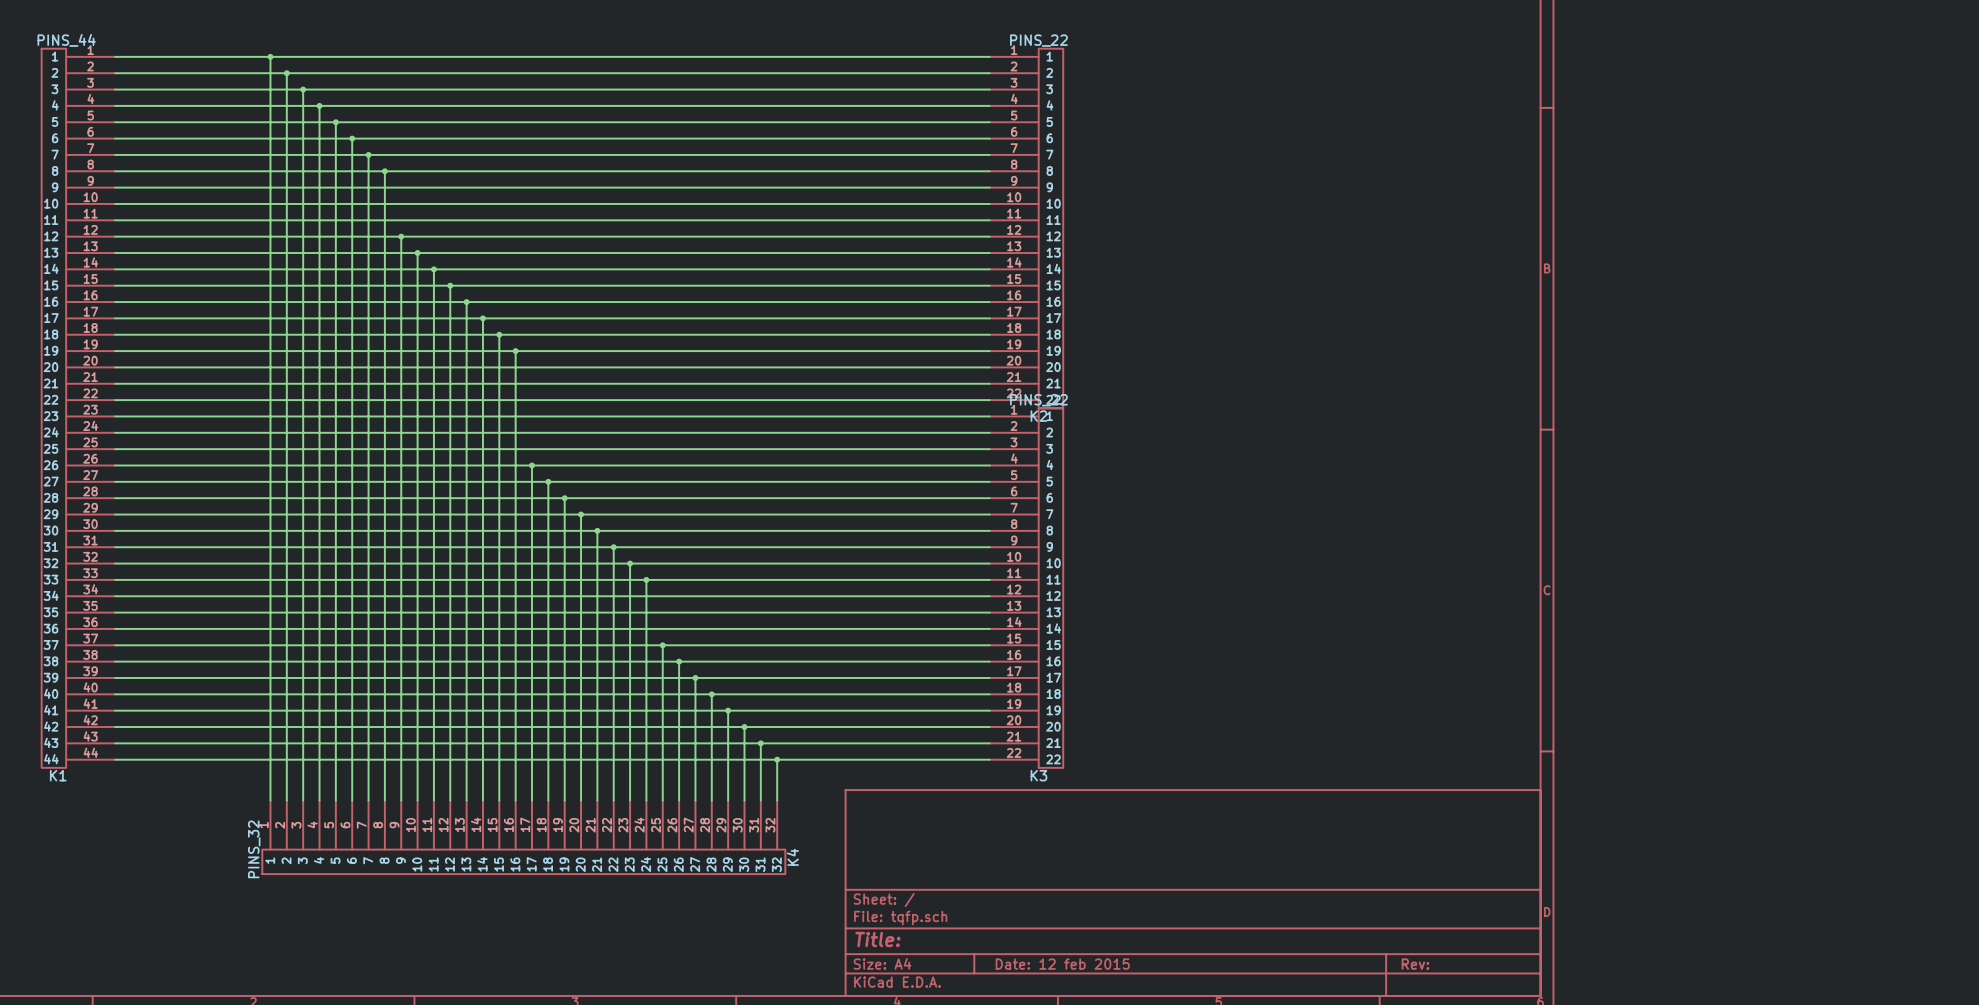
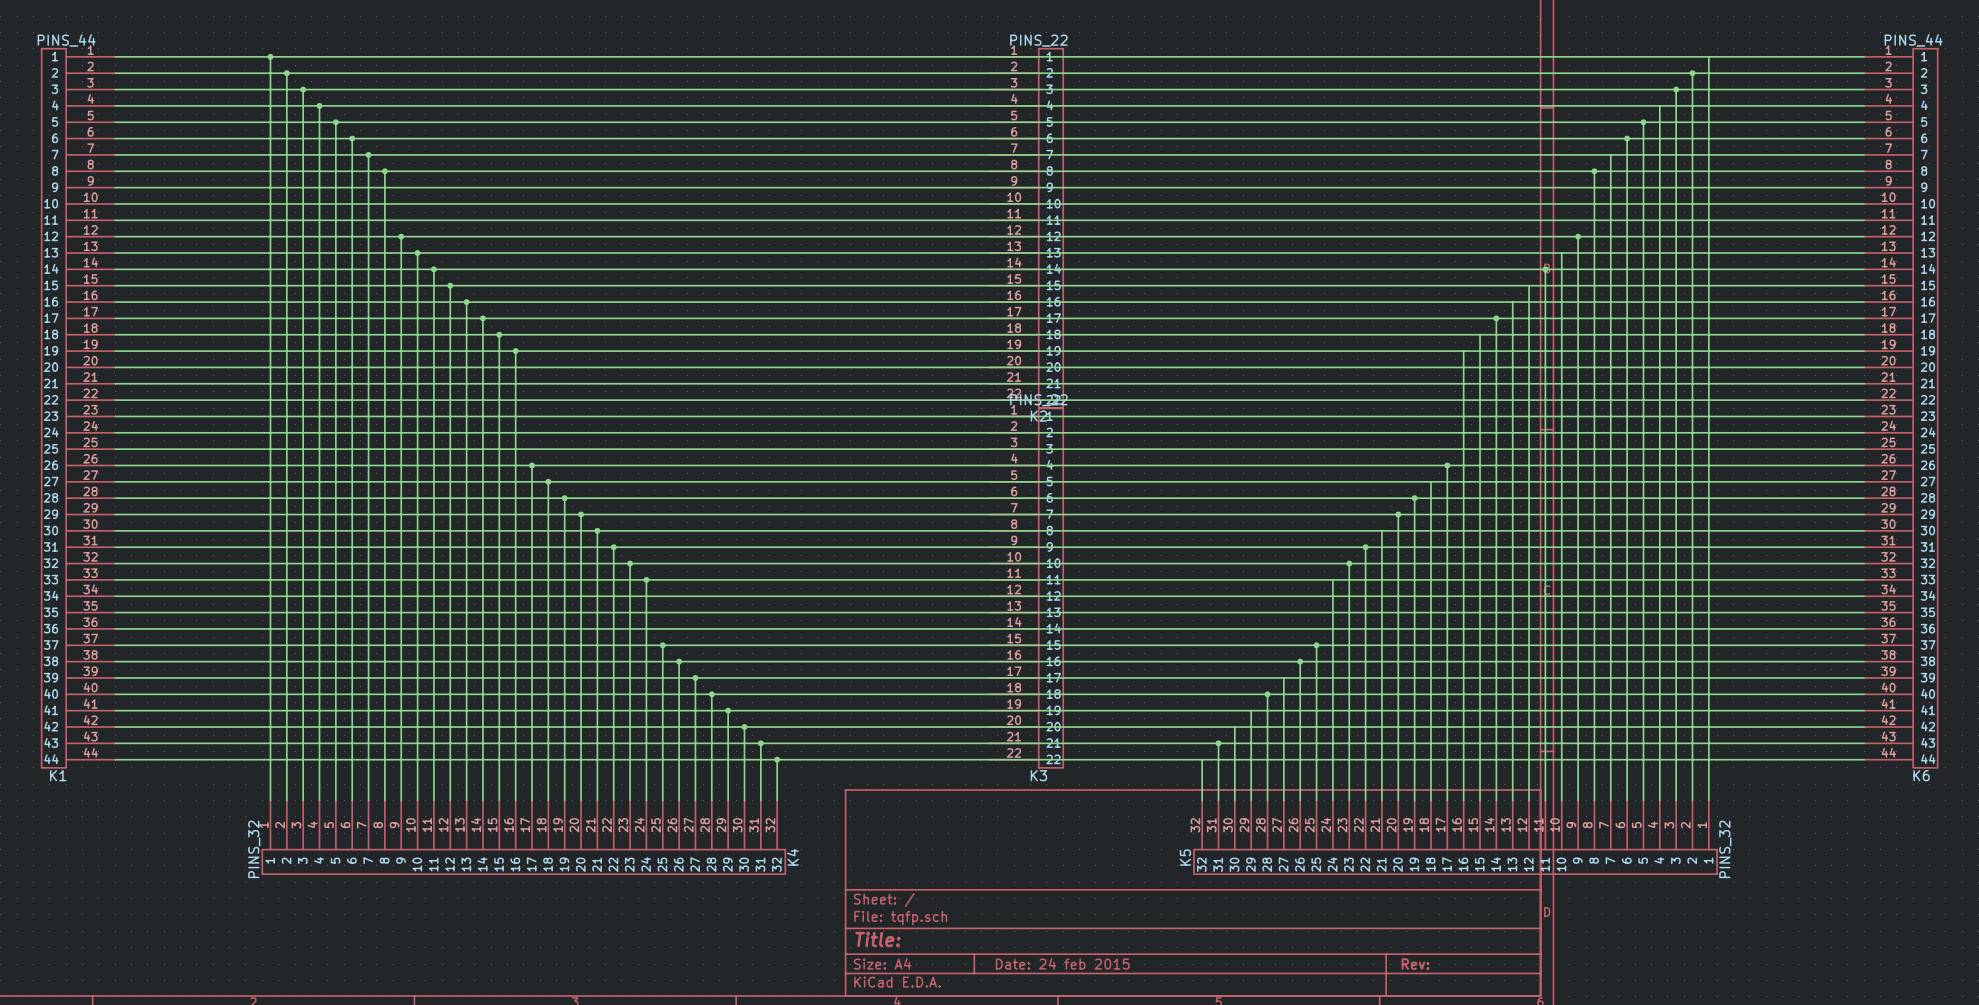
wire: none -> (989, 56) (1864, 56)
wire: none -> (1708, 56) (1708, 800)
wire: none -> (989, 73) (1864, 73)
wire: none -> (1692, 73) (1692, 800)
junction: none -> (1692, 73)
wire: none -> (989, 89) (1864, 89)
wire: none -> (1676, 89) (1676, 800)
junction: none -> (1676, 89)
wire: none -> (989, 105) (1864, 105)
wire: none -> (1659, 105) (1659, 800)
wire: none -> (989, 122) (1864, 122)
wire: none -> (1643, 122) (1643, 800)
junction: none -> (1643, 122)
wire: none -> (989, 138) (1864, 138)
wire: none -> (1627, 138) (1627, 800)
junction: none -> (1627, 138)
wire: none -> (989, 154) (1864, 154)
wire: none -> (1610, 154) (1610, 800)
wire: none -> (989, 171) (1864, 171)
wire: none -> (1594, 171) (1594, 800)
junction: none -> (1594, 171)
wire: none -> (989, 187) (1864, 187)
wire: none -> (989, 203) (1864, 203)
wire: none -> (989, 220) (1864, 220)
wire: none -> (989, 236) (1864, 236)
wire: none -> (1578, 236) (1578, 800)
junction: none -> (1578, 236)
wire: none -> (989, 253) (1864, 253)
wire: none -> (1561, 253) (1561, 800)
wire: none -> (989, 269) (1864, 269)
wire: none -> (1545, 269) (1545, 800)
junction: none -> (1545, 269)
wire: none -> (989, 285) (1864, 285)
wire: none -> (1529, 285) (1529, 800)
wire: none -> (989, 302) (1864, 302)
wire: none -> (1512, 302) (1512, 800)
wire: none -> (989, 318) (1864, 318)
wire: none -> (1496, 318) (1496, 800)
junction: none -> (1496, 318)
wire: none -> (989, 334) (1864, 334)
wire: none -> (1480, 334) (1480, 800)
wire: none -> (989, 351) (1864, 351)
wire: none -> (1463, 351) (1463, 800)
wire: none -> (989, 367) (1864, 367)
wire: none -> (989, 383) (1864, 383)
wire: none -> (989, 400) (1864, 400)
K6: none -> PINS_44 (1900, 408)
wire: none -> (989, 416) (1864, 416)
wire: none -> (989, 432) (1864, 432)
wire: none -> (989, 449) (1864, 449)
wire: none -> (989, 465) (1864, 465)
wire: none -> (1447, 465) (1447, 800)
junction: none -> (1447, 465)
wire: none -> (989, 481) (1864, 481)
wire: none -> (1430, 481) (1430, 800)
wire: none -> (989, 498) (1864, 498)
wire: none -> (1414, 498) (1414, 800)
junction: none -> (1414, 498)
wire: none -> (989, 514) (1864, 514)
wire: none -> (1398, 514) (1398, 800)
junction: none -> (1398, 514)
wire: none -> (989, 530) (1864, 530)
wire: none -> (1381, 530) (1381, 800)
wire: none -> (989, 547) (1864, 547)
wire: none -> (1365, 547) (1365, 800)
junction: none -> (1365, 547)
wire: none -> (989, 563) (1864, 563)
wire: none -> (1349, 563) (1349, 800)
junction: none -> (1349, 563)
wire: none -> (989, 579) (1864, 579)
wire: none -> (1332, 579) (1332, 800)
wire: none -> (989, 596) (1864, 596)
wire: none -> (989, 612) (1864, 612)
wire: none -> (989, 628) (1864, 628)
wire: none -> (989, 645) (1864, 645)
wire: none -> (1316, 645) (1316, 800)
junction: none -> (1316, 645)
wire: none -> (989, 661) (1864, 661)
wire: none -> (1300, 661) (1300, 800)
junction: none -> (1300, 661)
wire: none -> (989, 677) (1864, 677)
wire: none -> (1283, 677) (1283, 800)
wire: none -> (989, 694) (1864, 694)
wire: none -> (1267, 694) (1267, 800)
junction: none -> (1267, 694)
wire: none -> (989, 710) (1864, 710)
wire: none -> (1251, 710) (1251, 800)
wire: none -> (989, 727) (1864, 727)
wire: none -> (1234, 727) (1234, 800)
wire: none -> (989, 743) (1864, 743)
wire: none -> (1218, 743) (1218, 800)
junction: none -> (1218, 743)
wire: none -> (989, 759) (1864, 759)
wire: none -> (1202, 759) (1202, 800)
K5: none -> PINS_32 (1455, 837)
title block: Date: 12 feb 2015 (1062, 964) -> Date: 24 feb 2015 (1062, 963)

